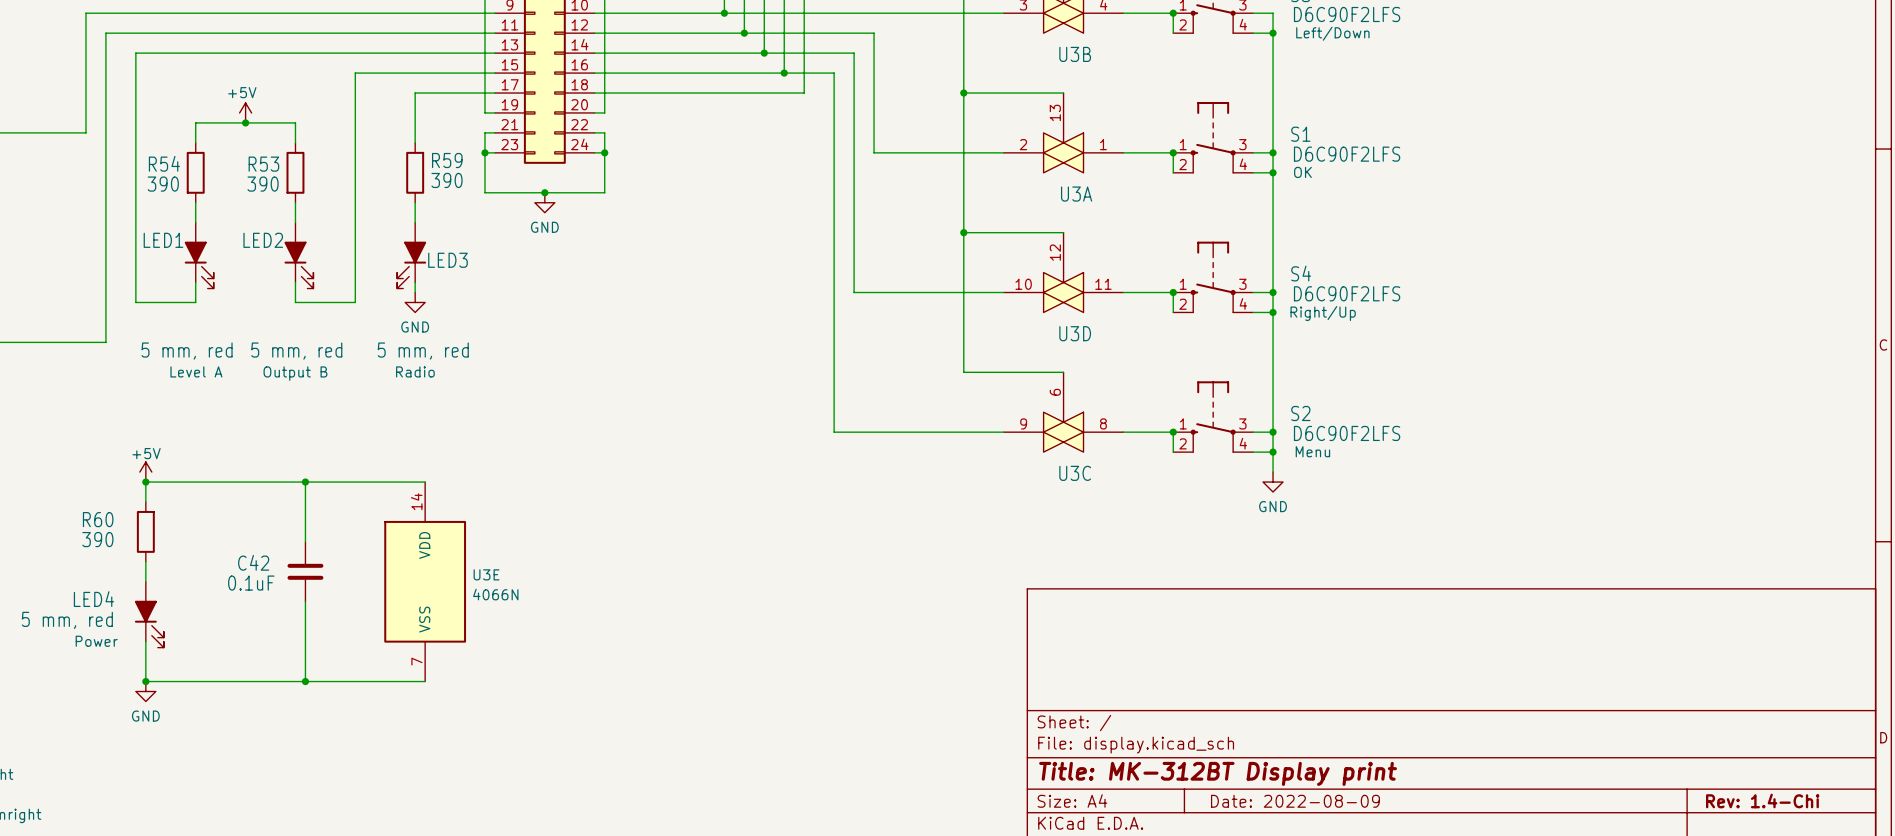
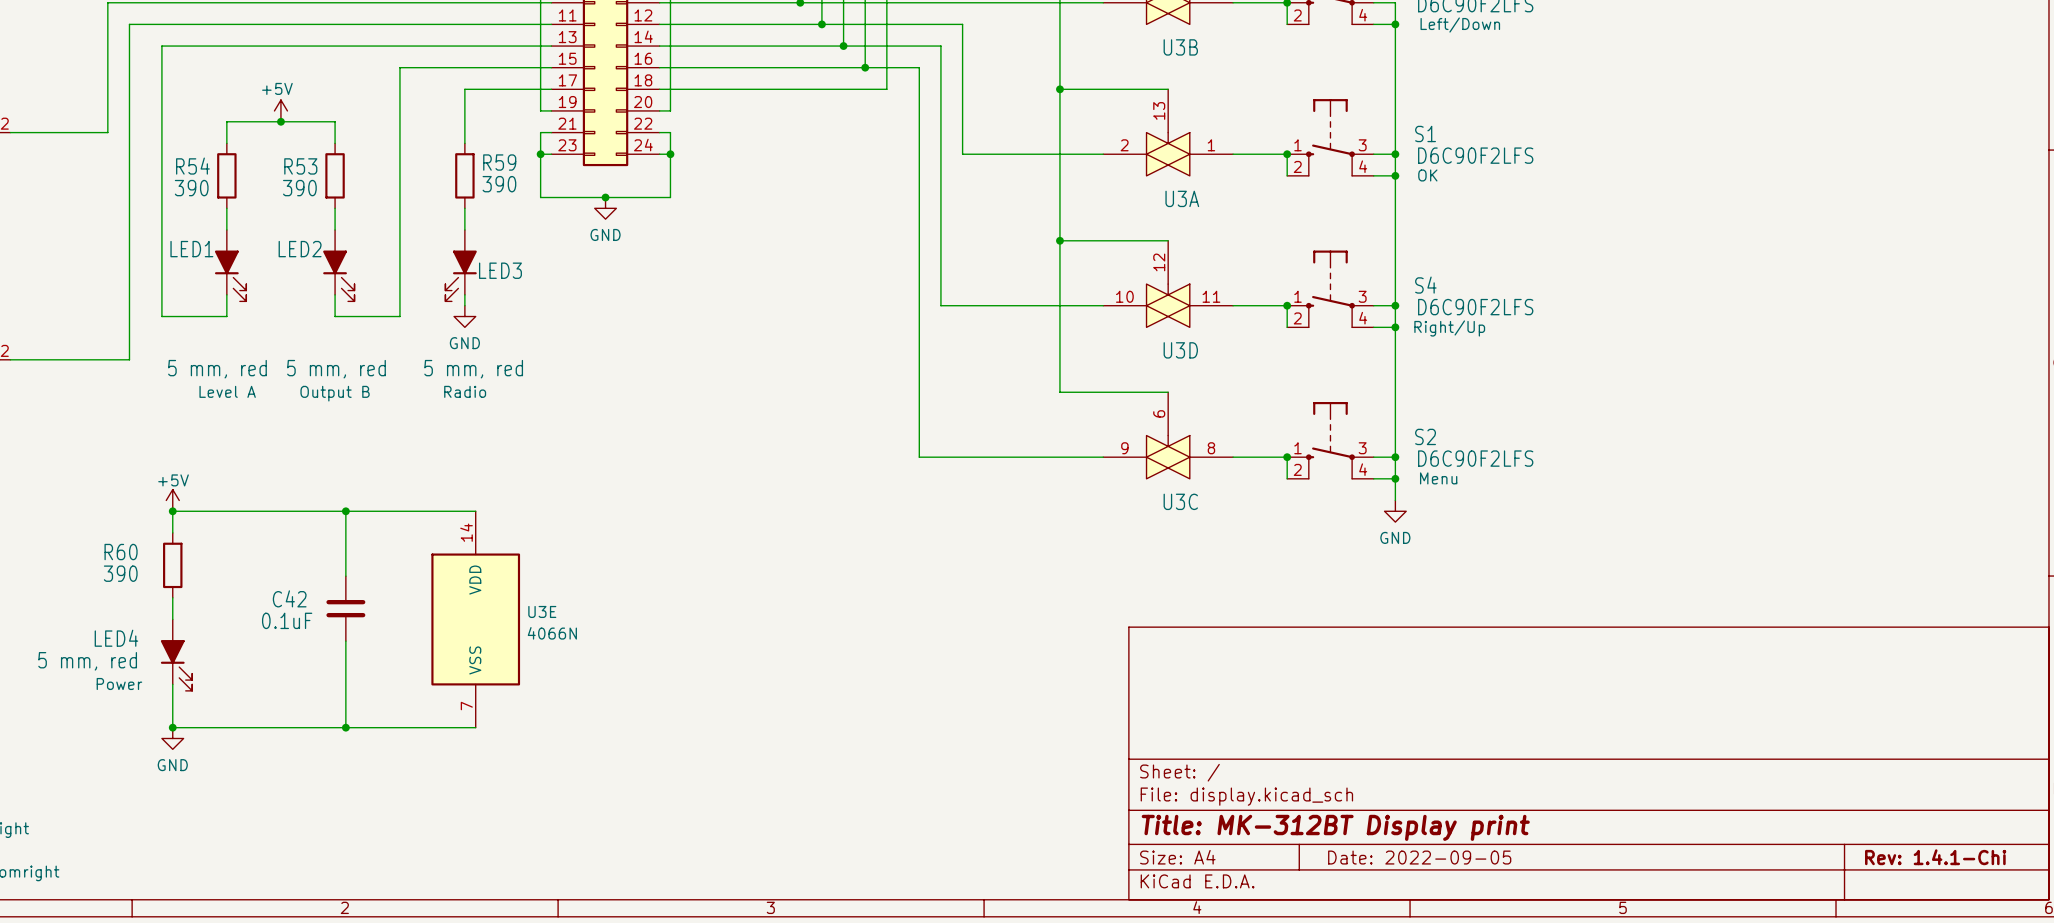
title block: Rev: 1.4-Chi (1762, 800) -> Rev: 1.4.1-Chi (1935, 857)
title block: Date: 2022-08-09 (1295, 801) -> Date: 2022-09-05 (1419, 857)

